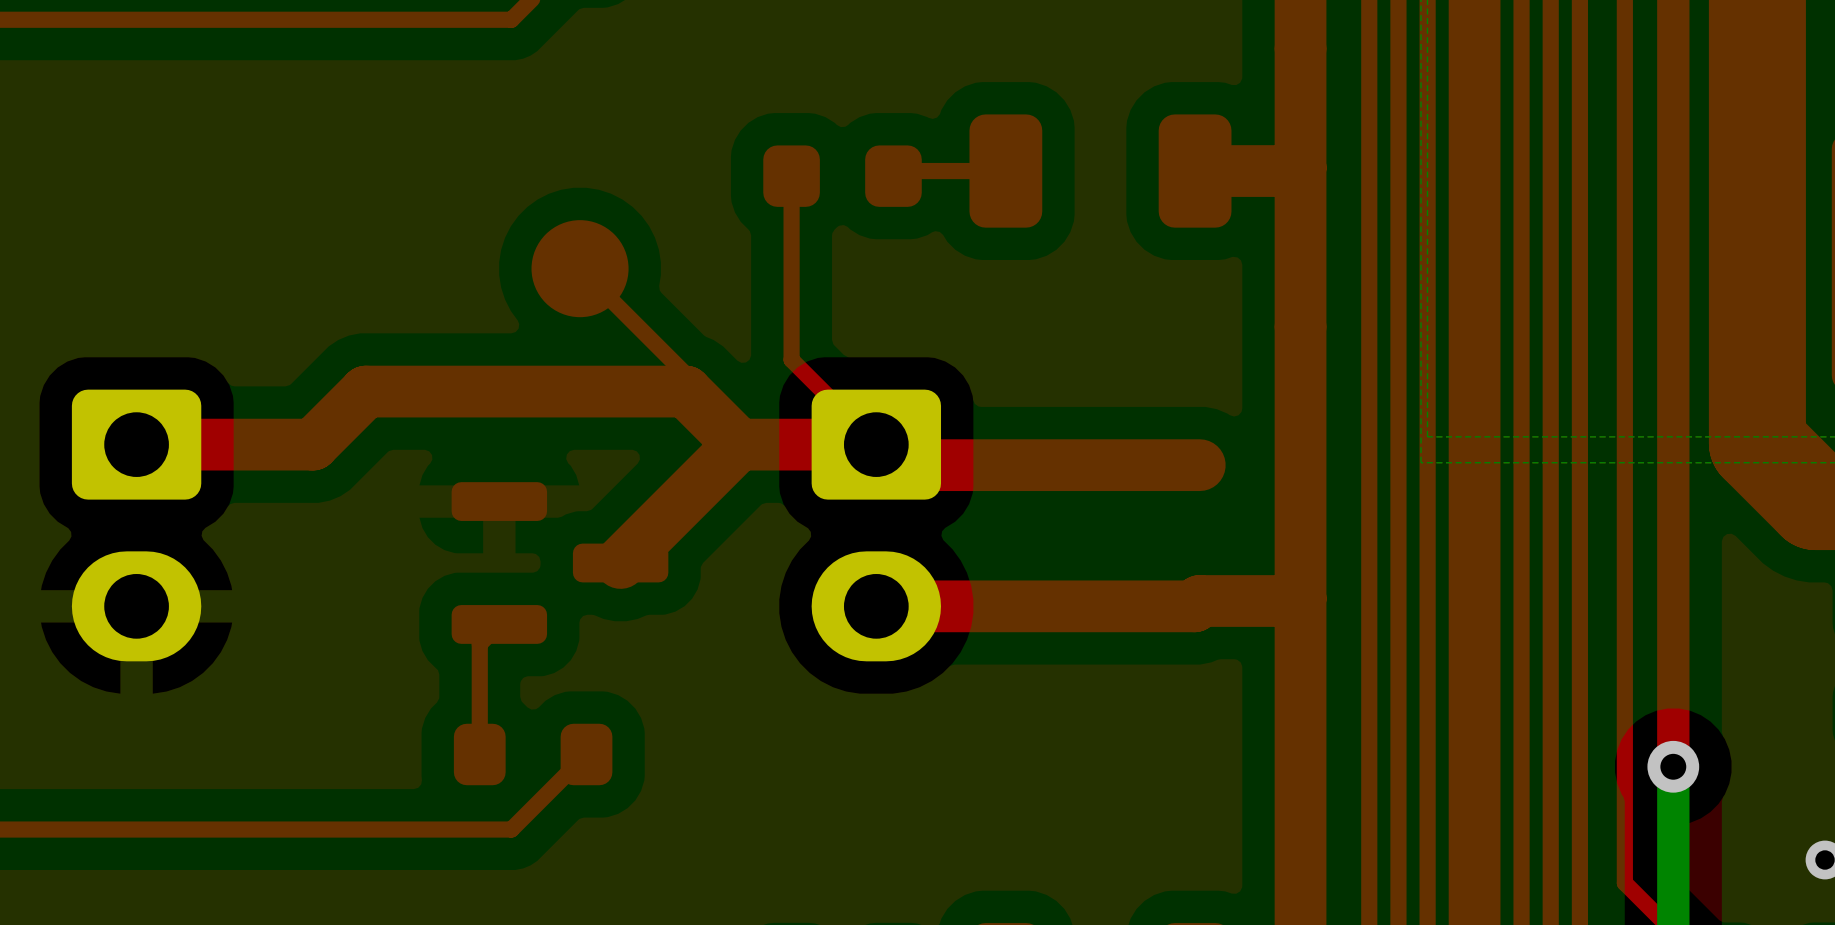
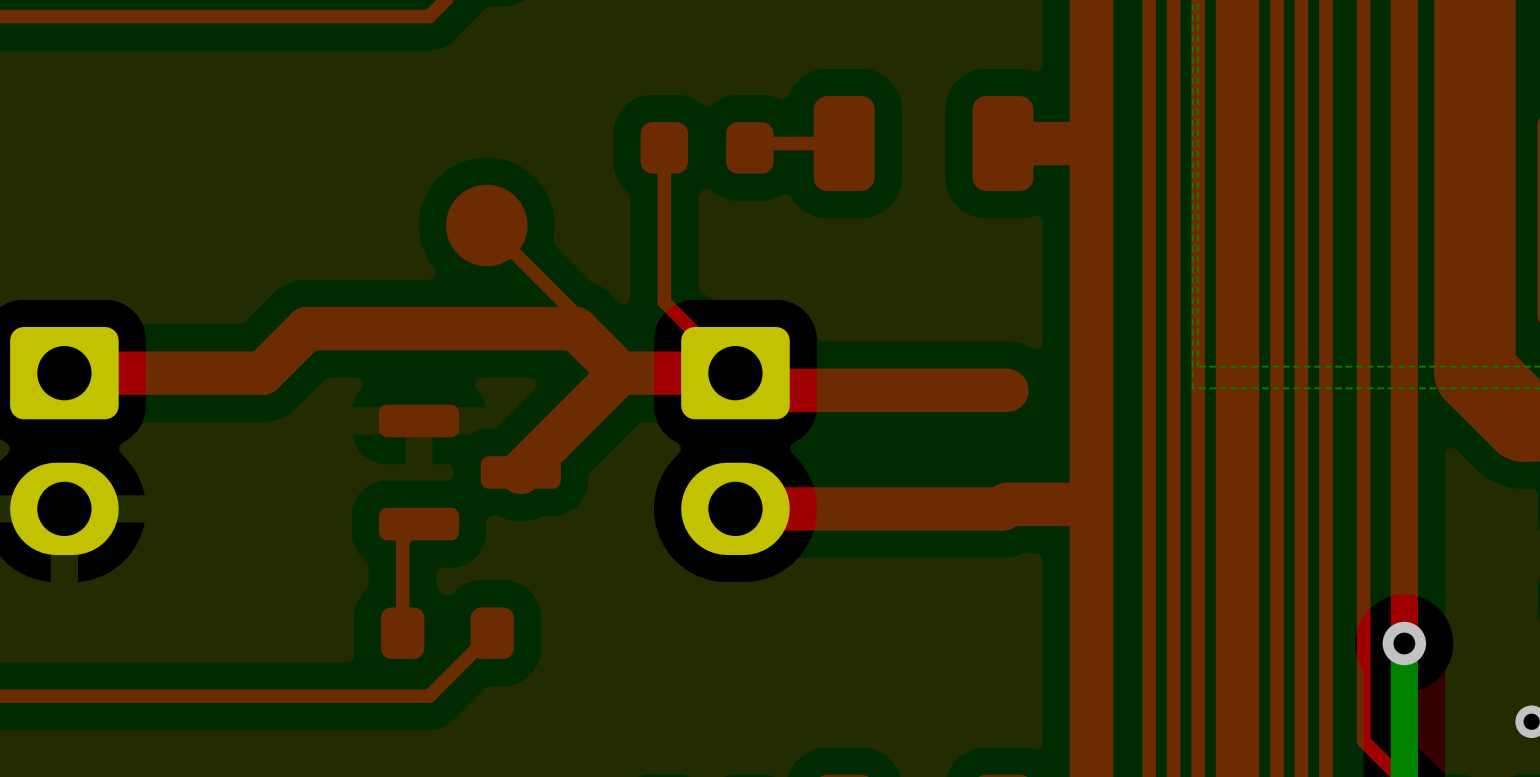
part position: (136, 525) -> (64, 441)

